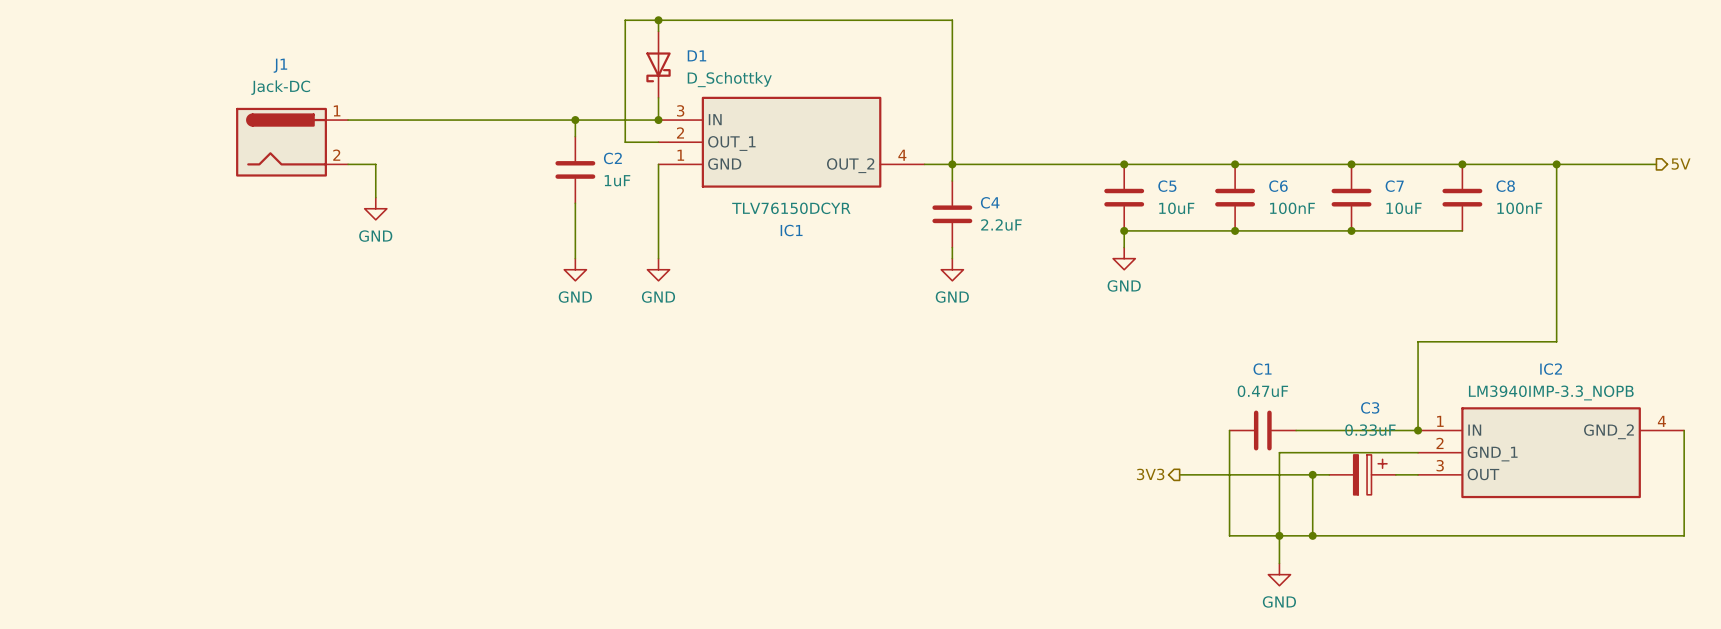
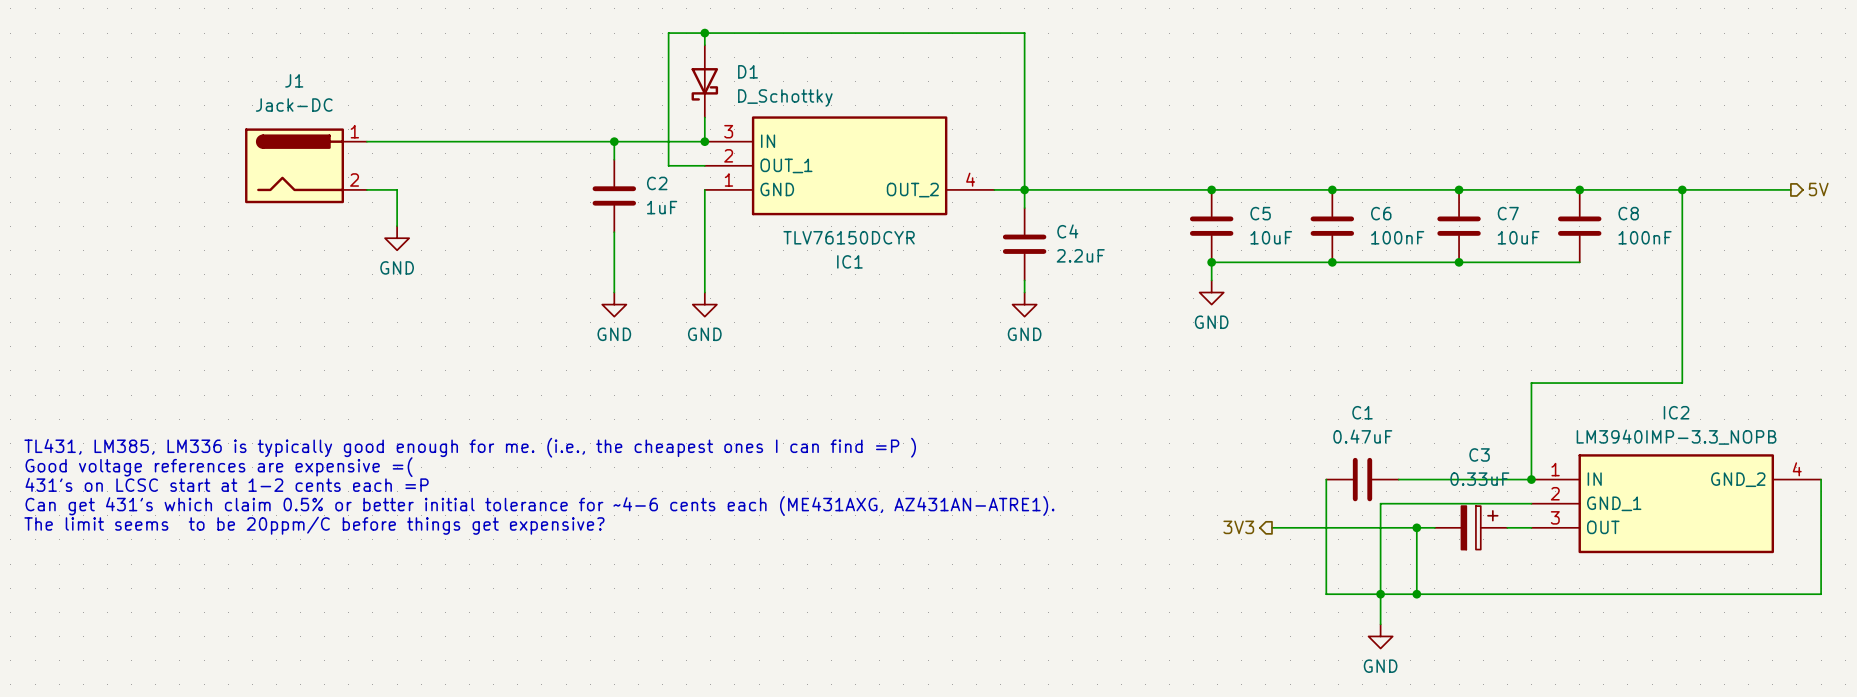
text: none -> TL431, LM385, LM336 is typically good enough for me. (i.e., the cheapest ones I can find =P ) (470, 447)
text: none -> Good voltage references are expensive =( (219, 467)
text: none -> 431's on LCSC start at 1-2 cents each =P (227, 484)
text: none -> Can get 431's which claim 0.5% or better initial tolerance for ~4-6 cents each (ME431AXG, AZ431AN-ATRE1). (539, 505)
text: none -> The limit seems to be 20ppm/C before things get expensive? (314, 525)

